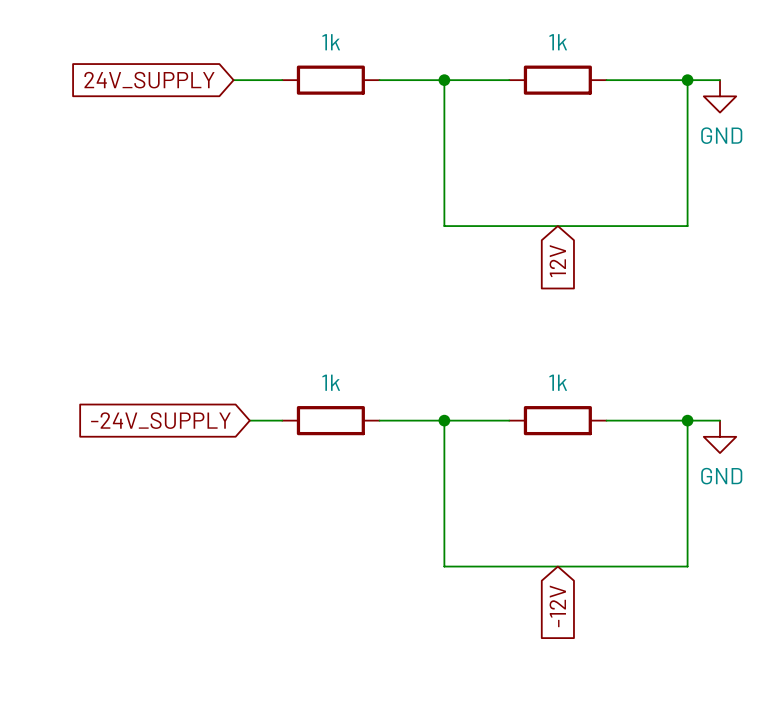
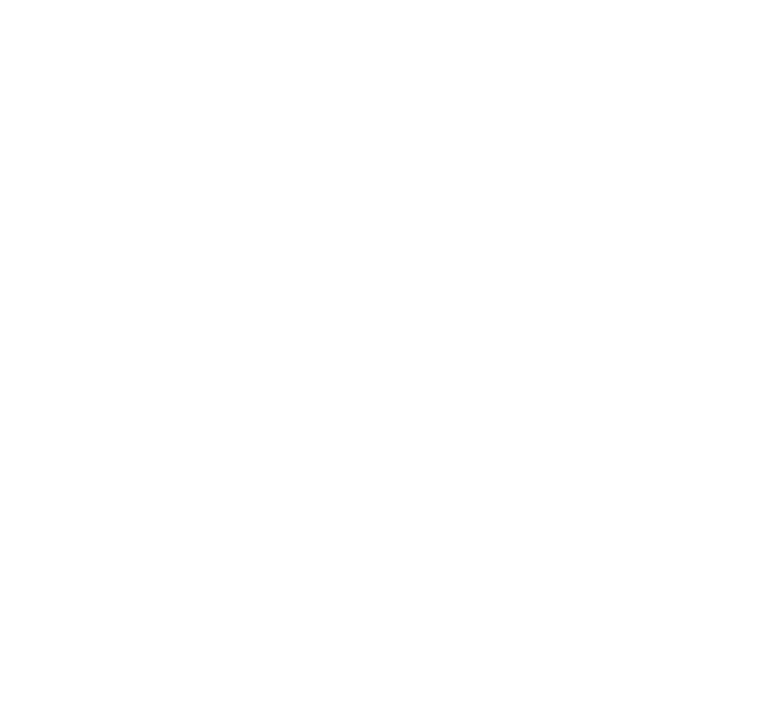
global label: 24V_SUPPLY (149, 80) -> none
wire: (233, 80) (282, 80) -> none
part: 1k (330, 80) -> none
wire: (379, 80) (509, 80) -> none
wire: (444, 80) (444, 226) (687, 226) (687, 80) -> none
junction: (444, 80) -> none
part: 1k (557, 80) -> none
wire: (606, 80) (720, 80) -> none
junction: (687, 80) -> none
power symbol: GND (720, 96) -> none
global label: 12V (557, 261) -> none
global label: -24V_SUPPLY (160, 420) -> none
wire: (249, 420) (282, 420) -> none
part: 1k (330, 420) -> none
wire: (379, 420) (509, 420) -> none
wire: (444, 420) (444, 566) (687, 566) (687, 420) -> none
junction: (444, 420) -> none
part: 1k (557, 420) -> none
wire: (606, 420) (720, 420) -> none
junction: (687, 420) -> none
power symbol: GND (720, 436) -> none
global label: -12V (557, 606) -> none

